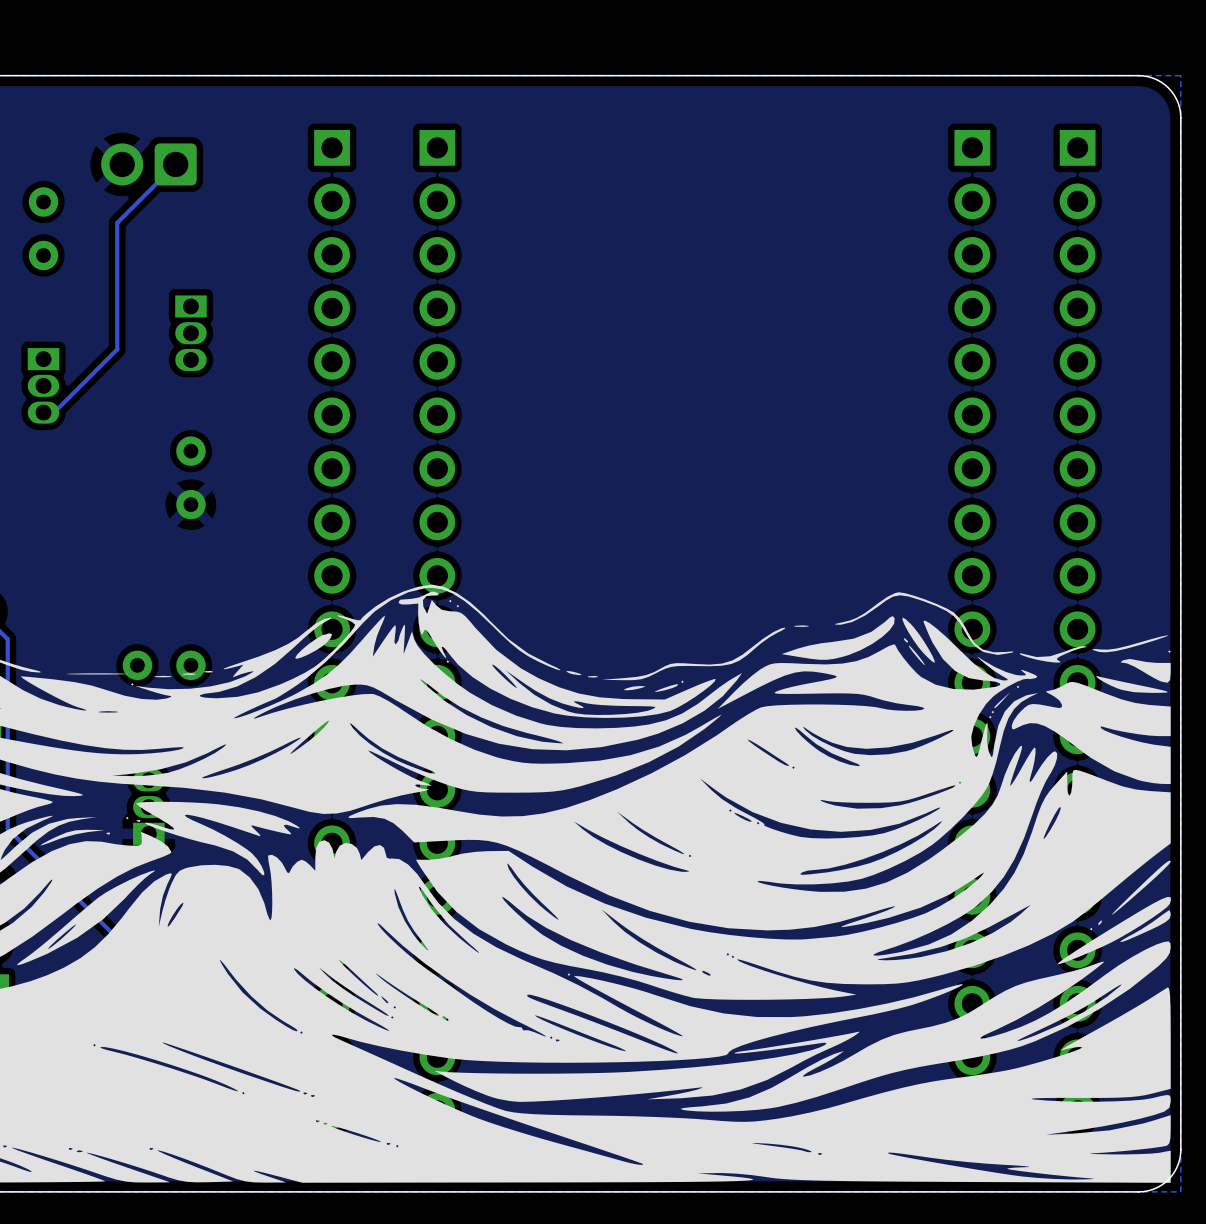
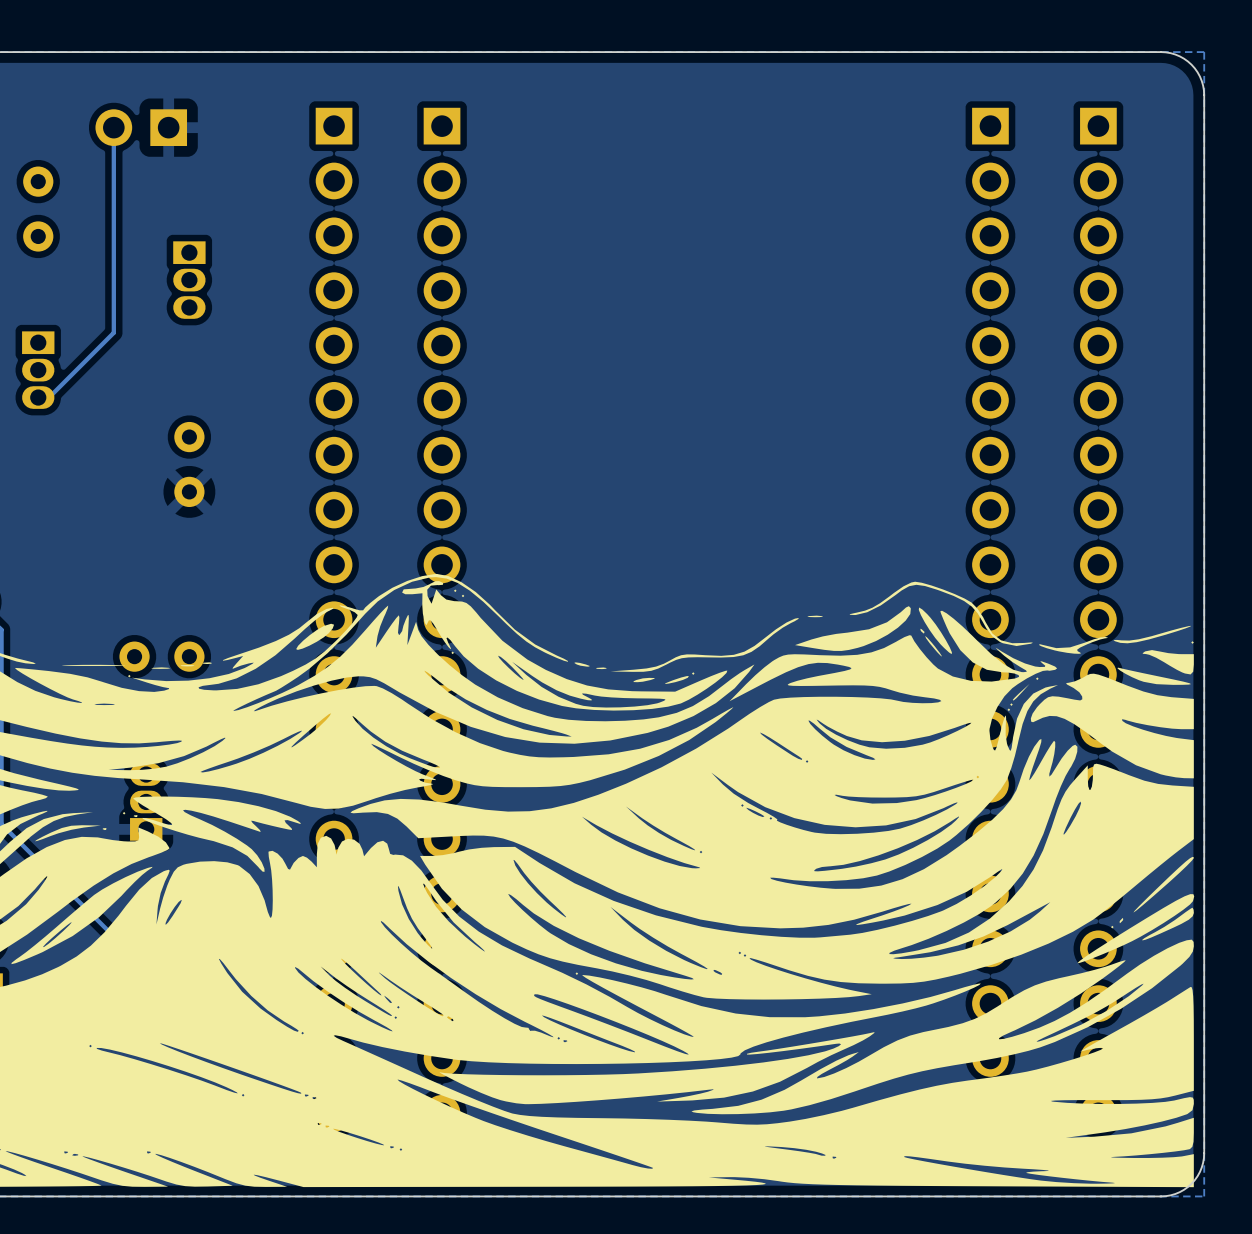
part footprint: [101, 143, 197, 186] -> [95, 109, 188, 147]
track: (175, 164) (117, 222) -> (113, 127) (113, 203)
part position: (190, 333) -> (189, 280)

